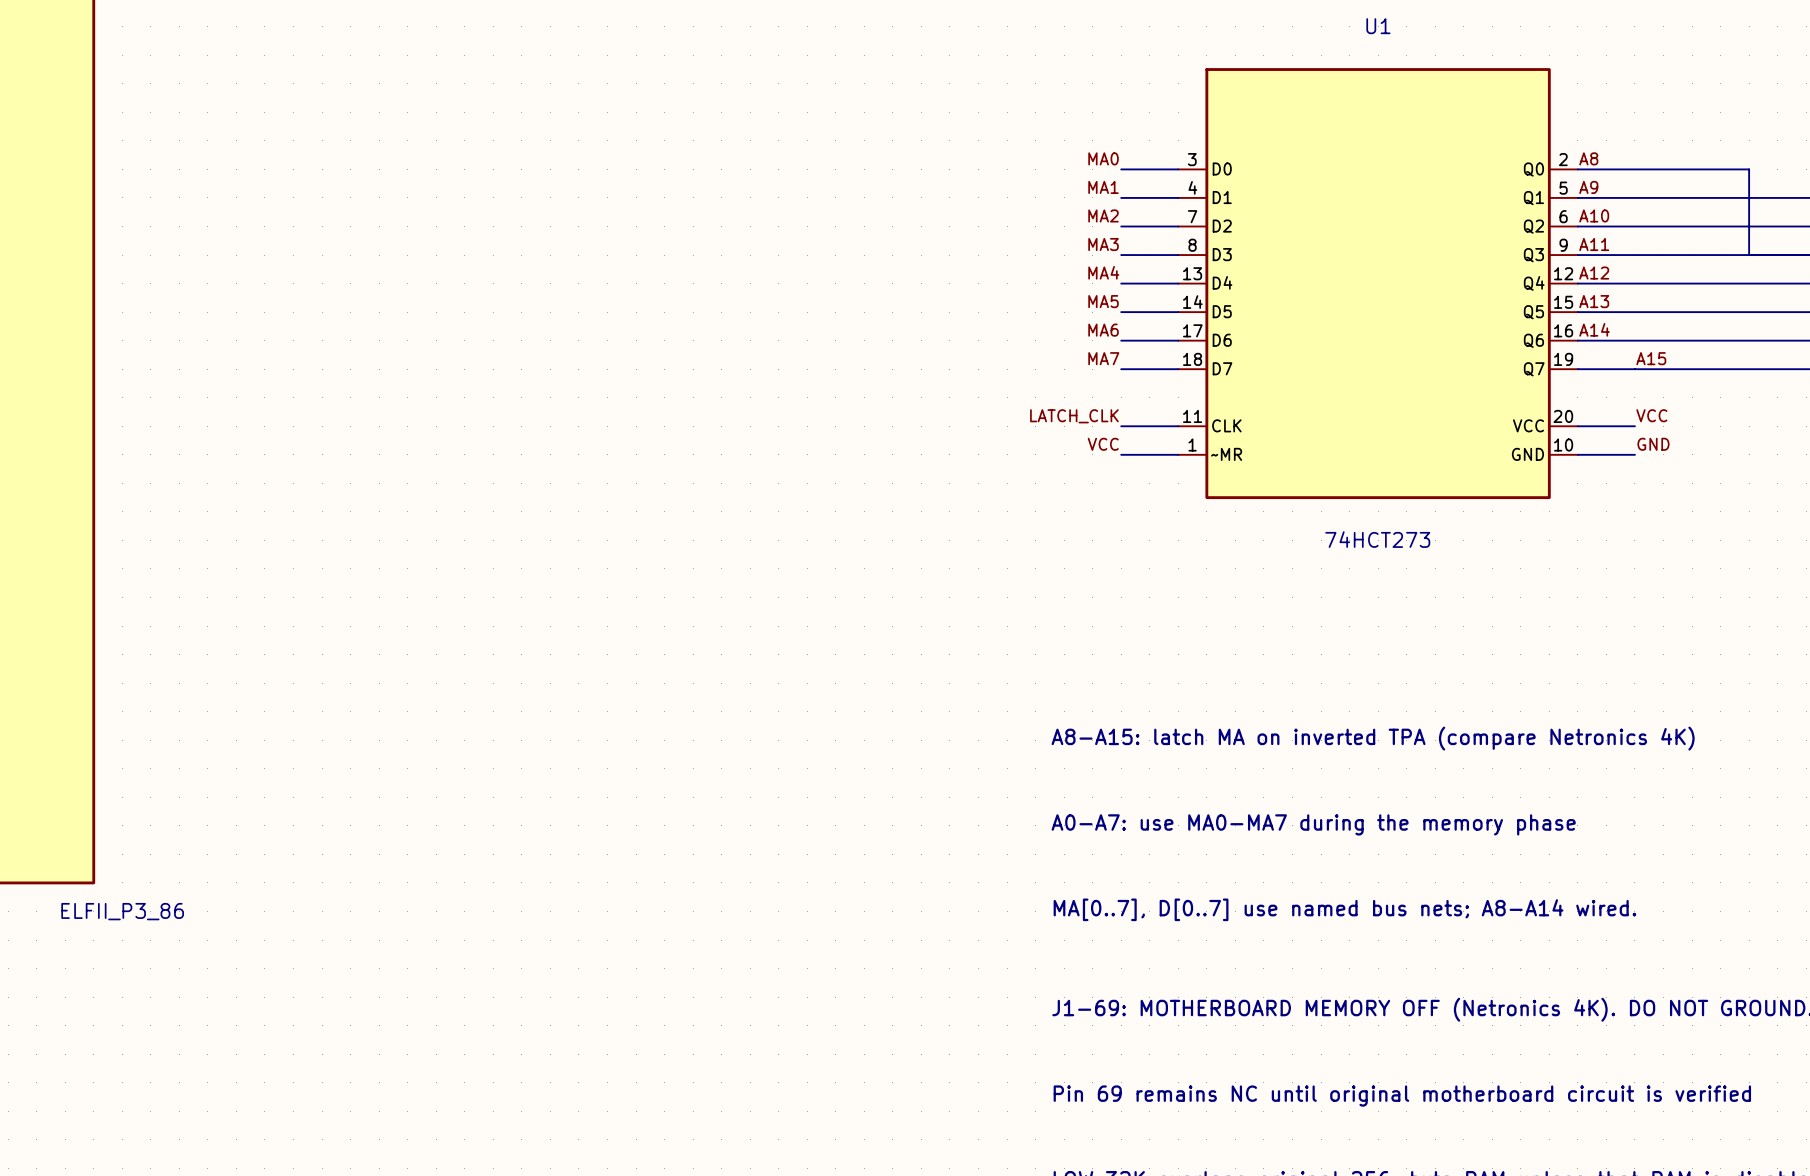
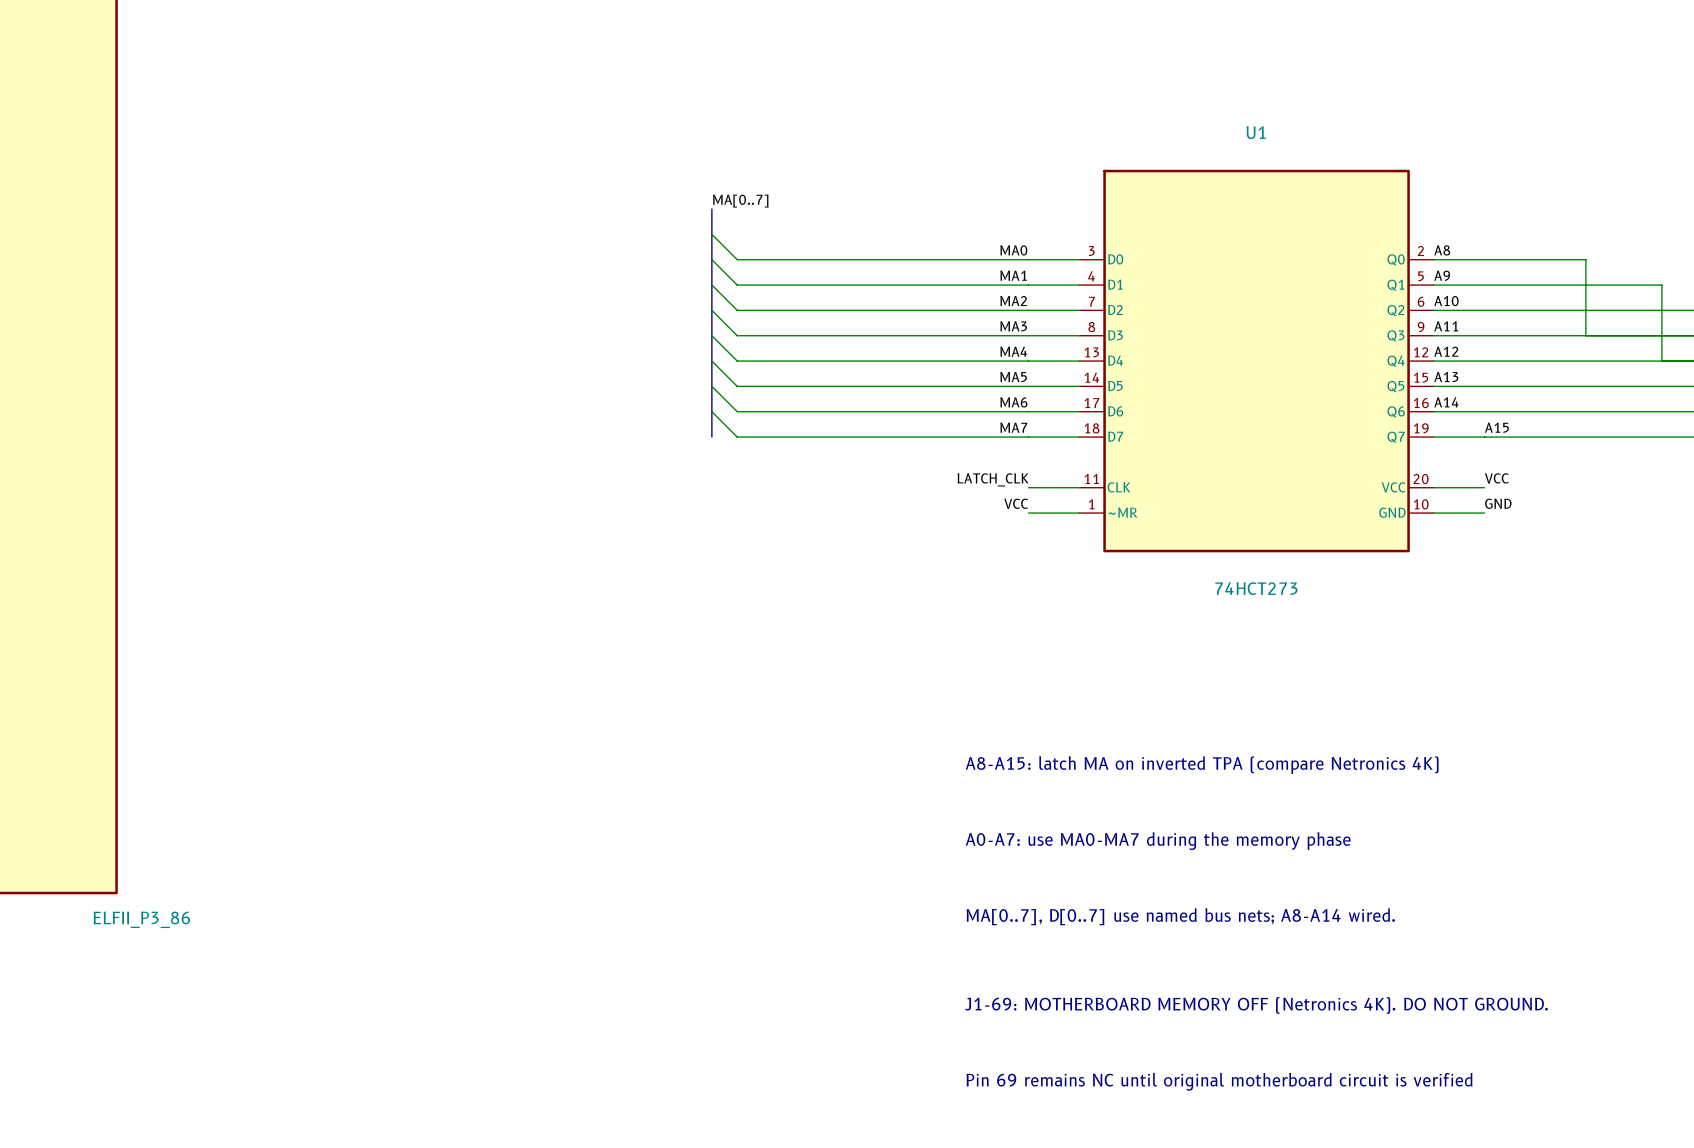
label: none -> MA[0..7] (740, 201)
bus: none -> (711, 209) (711, 437)
wire: none -> (711, 234) (737, 259) (1028, 259)
wire: none -> (711, 259) (737, 285) (1028, 285)
wire: none -> (711, 285) (737, 310) (1028, 310)
wire: none -> (711, 310) (737, 335) (1028, 335)
wire: none -> (711, 335) (737, 361) (1028, 361)
wire: none -> (711, 361) (737, 386) (1028, 386)
wire: none -> (711, 386) (737, 411) (1028, 411)
wire: none -> (711, 411) (737, 437) (1028, 437)

